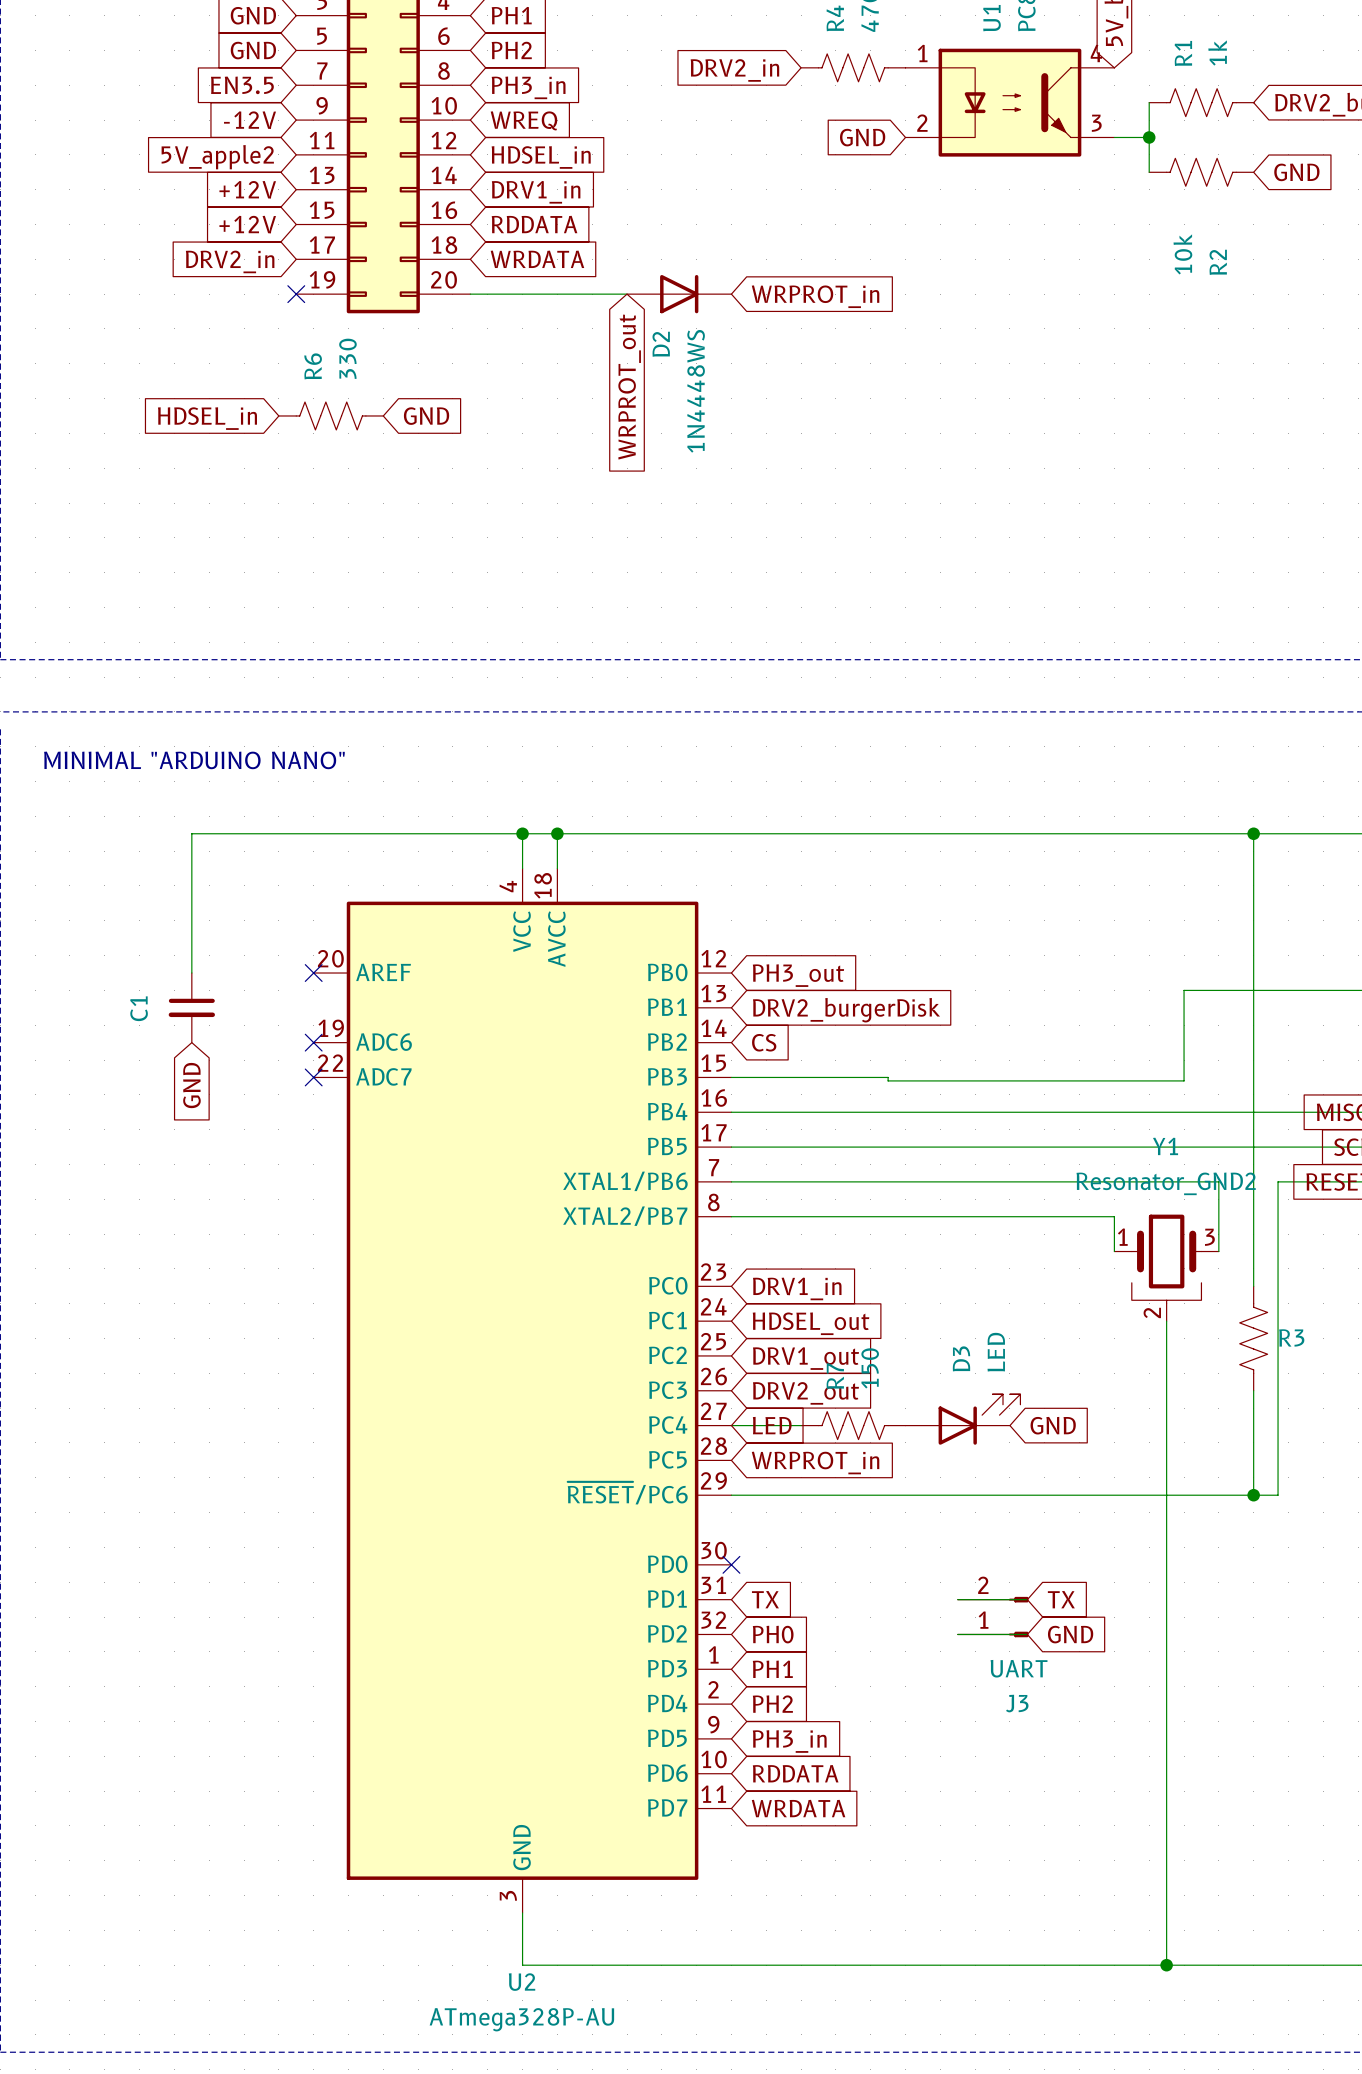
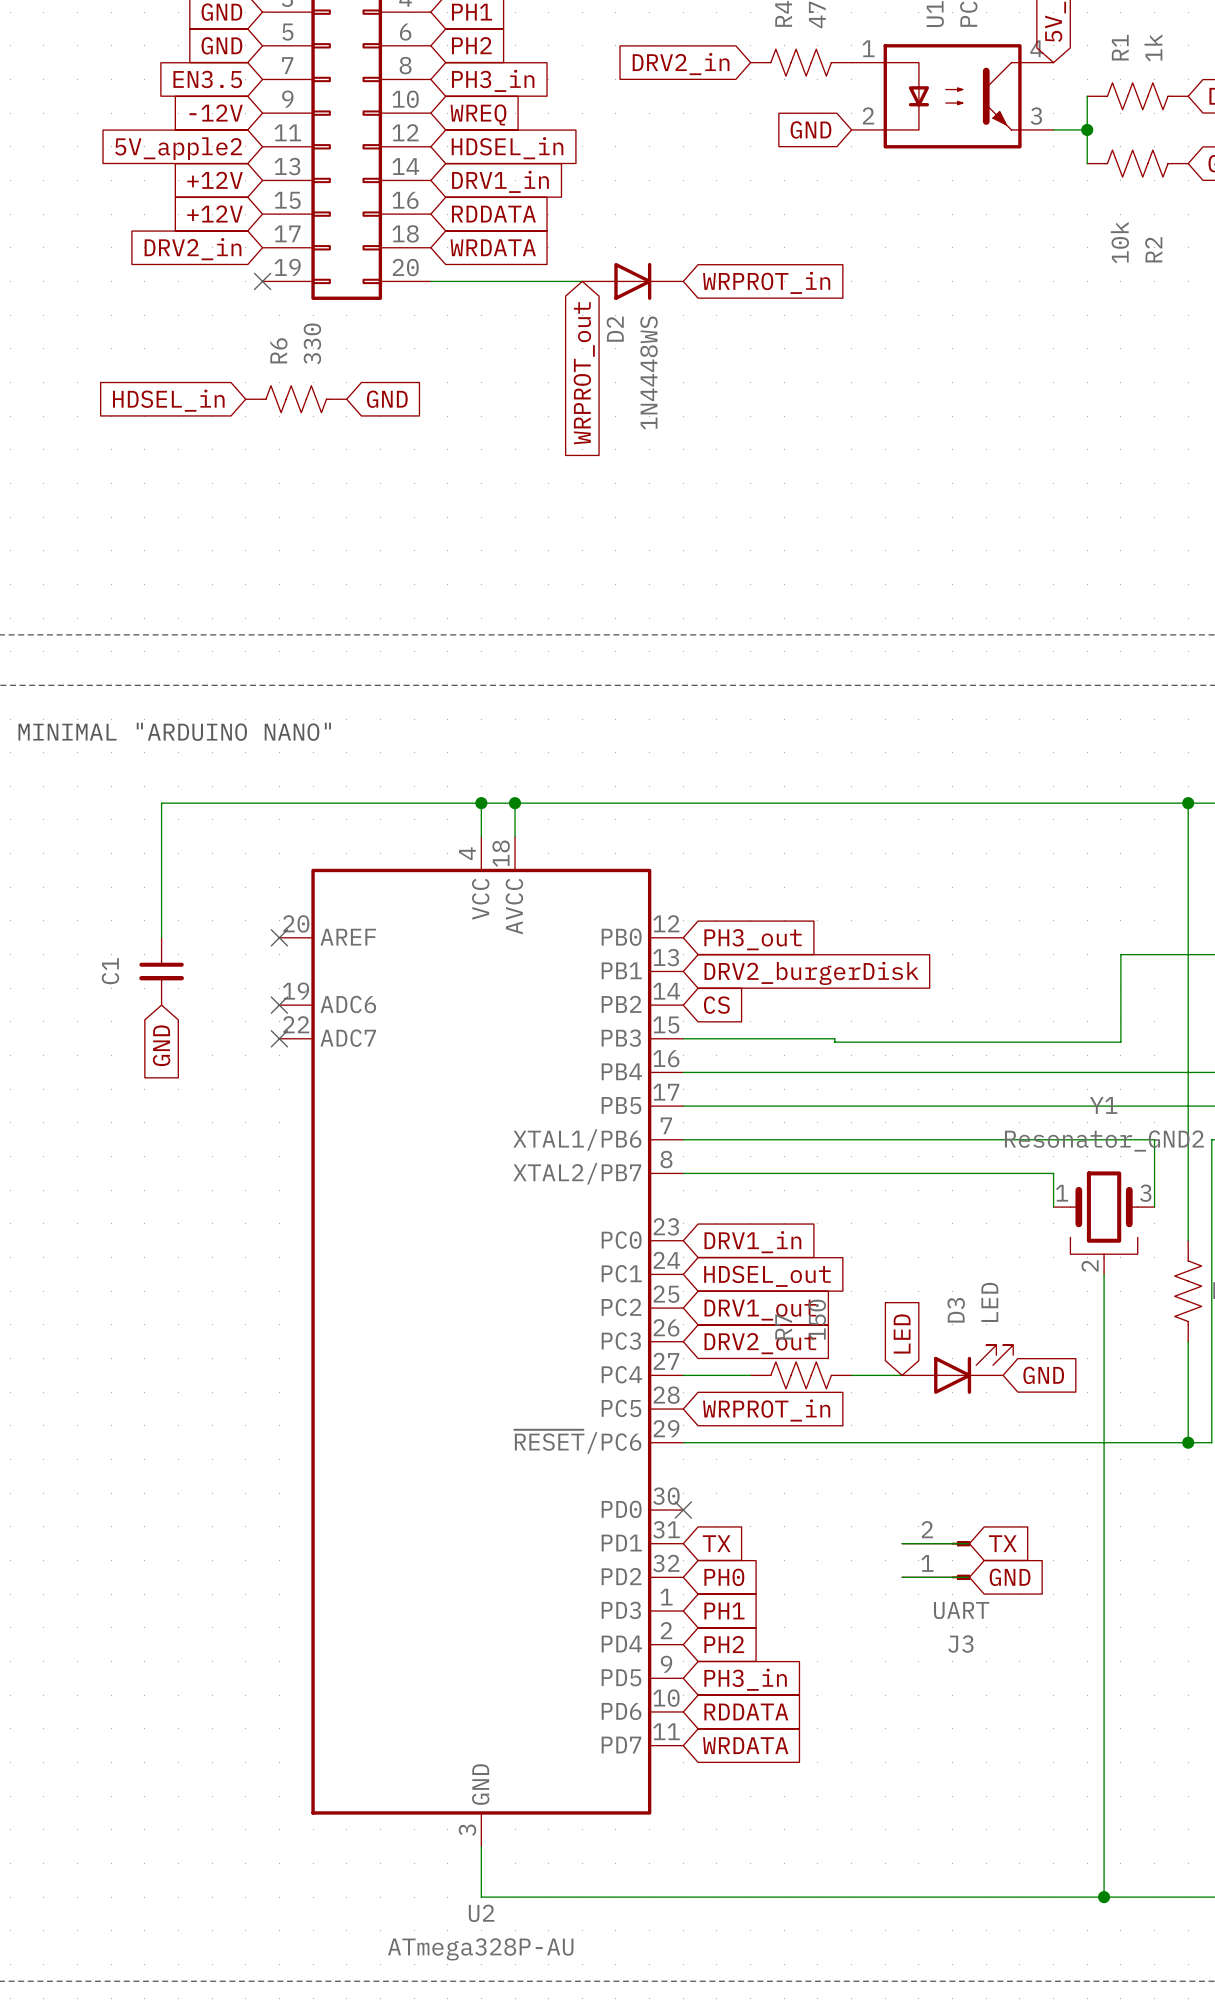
D3 position: (962, 1419) -> (957, 1369)
global label rotation: 0° (772, 1425) -> 90° counterclockwise (902, 1333)
global label position: LED (772, 1425) -> LED (902, 1333)
global label position: GND (1053, 1425) -> GND (1043, 1375)

